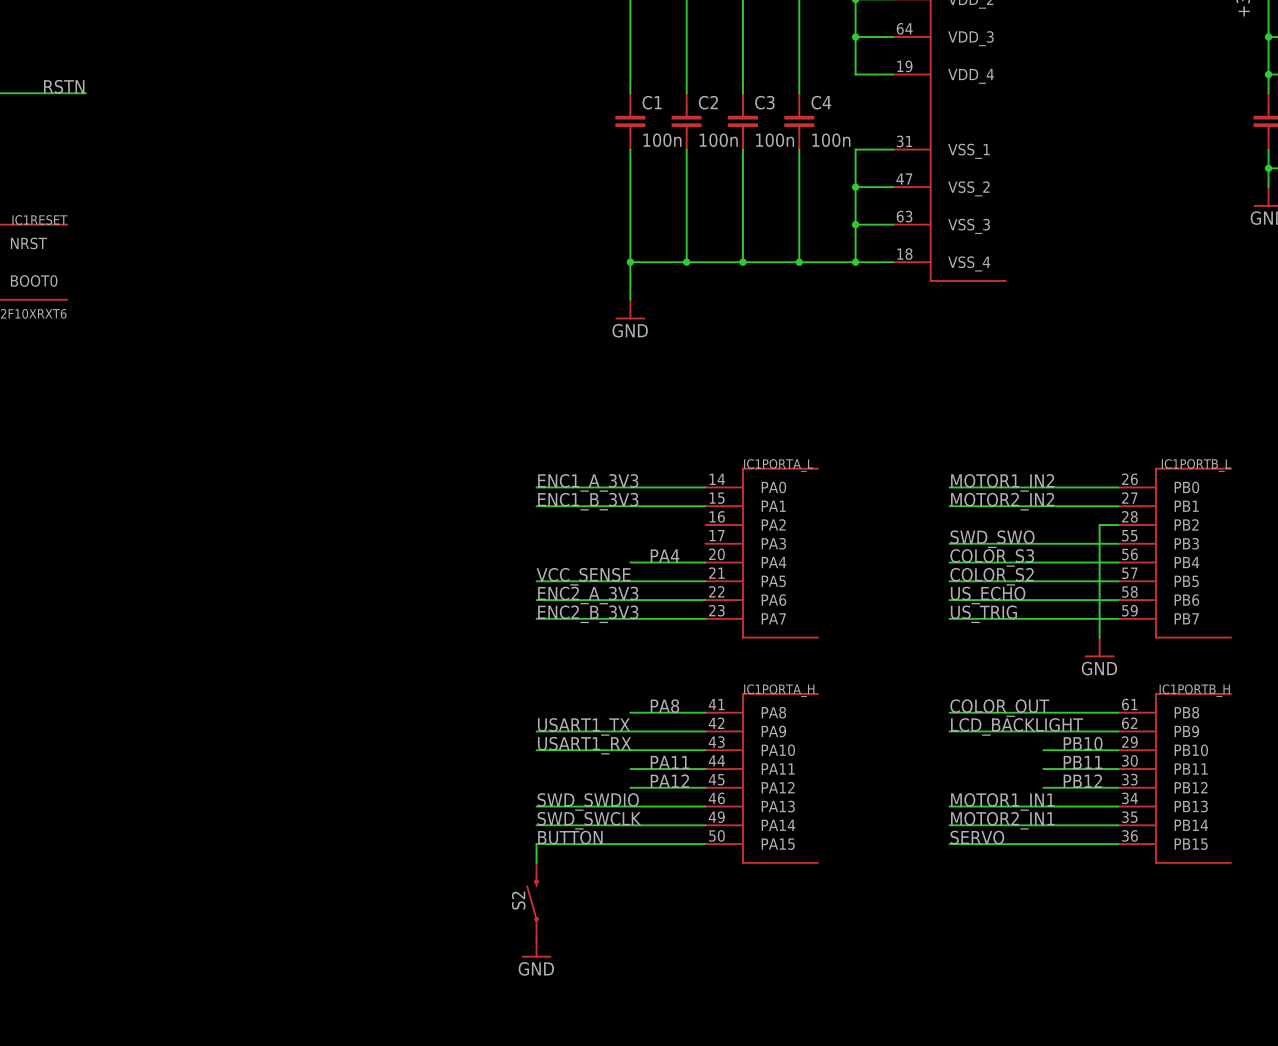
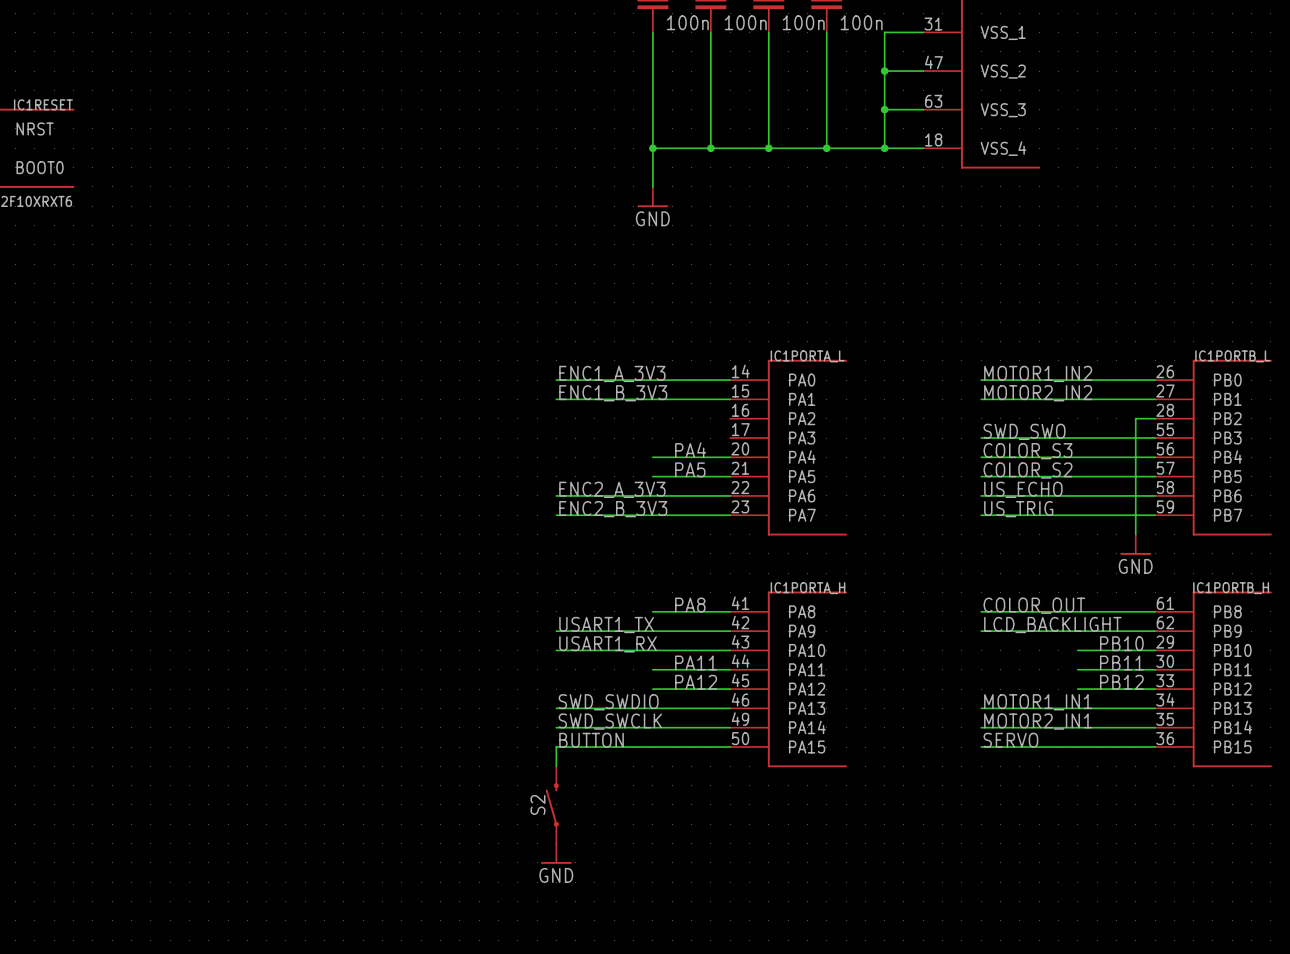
label: none -> PA5 (690, 469)
label: VCC_SENSE (583, 576) -> none
wire: (536, 581) (630, 581) -> none

